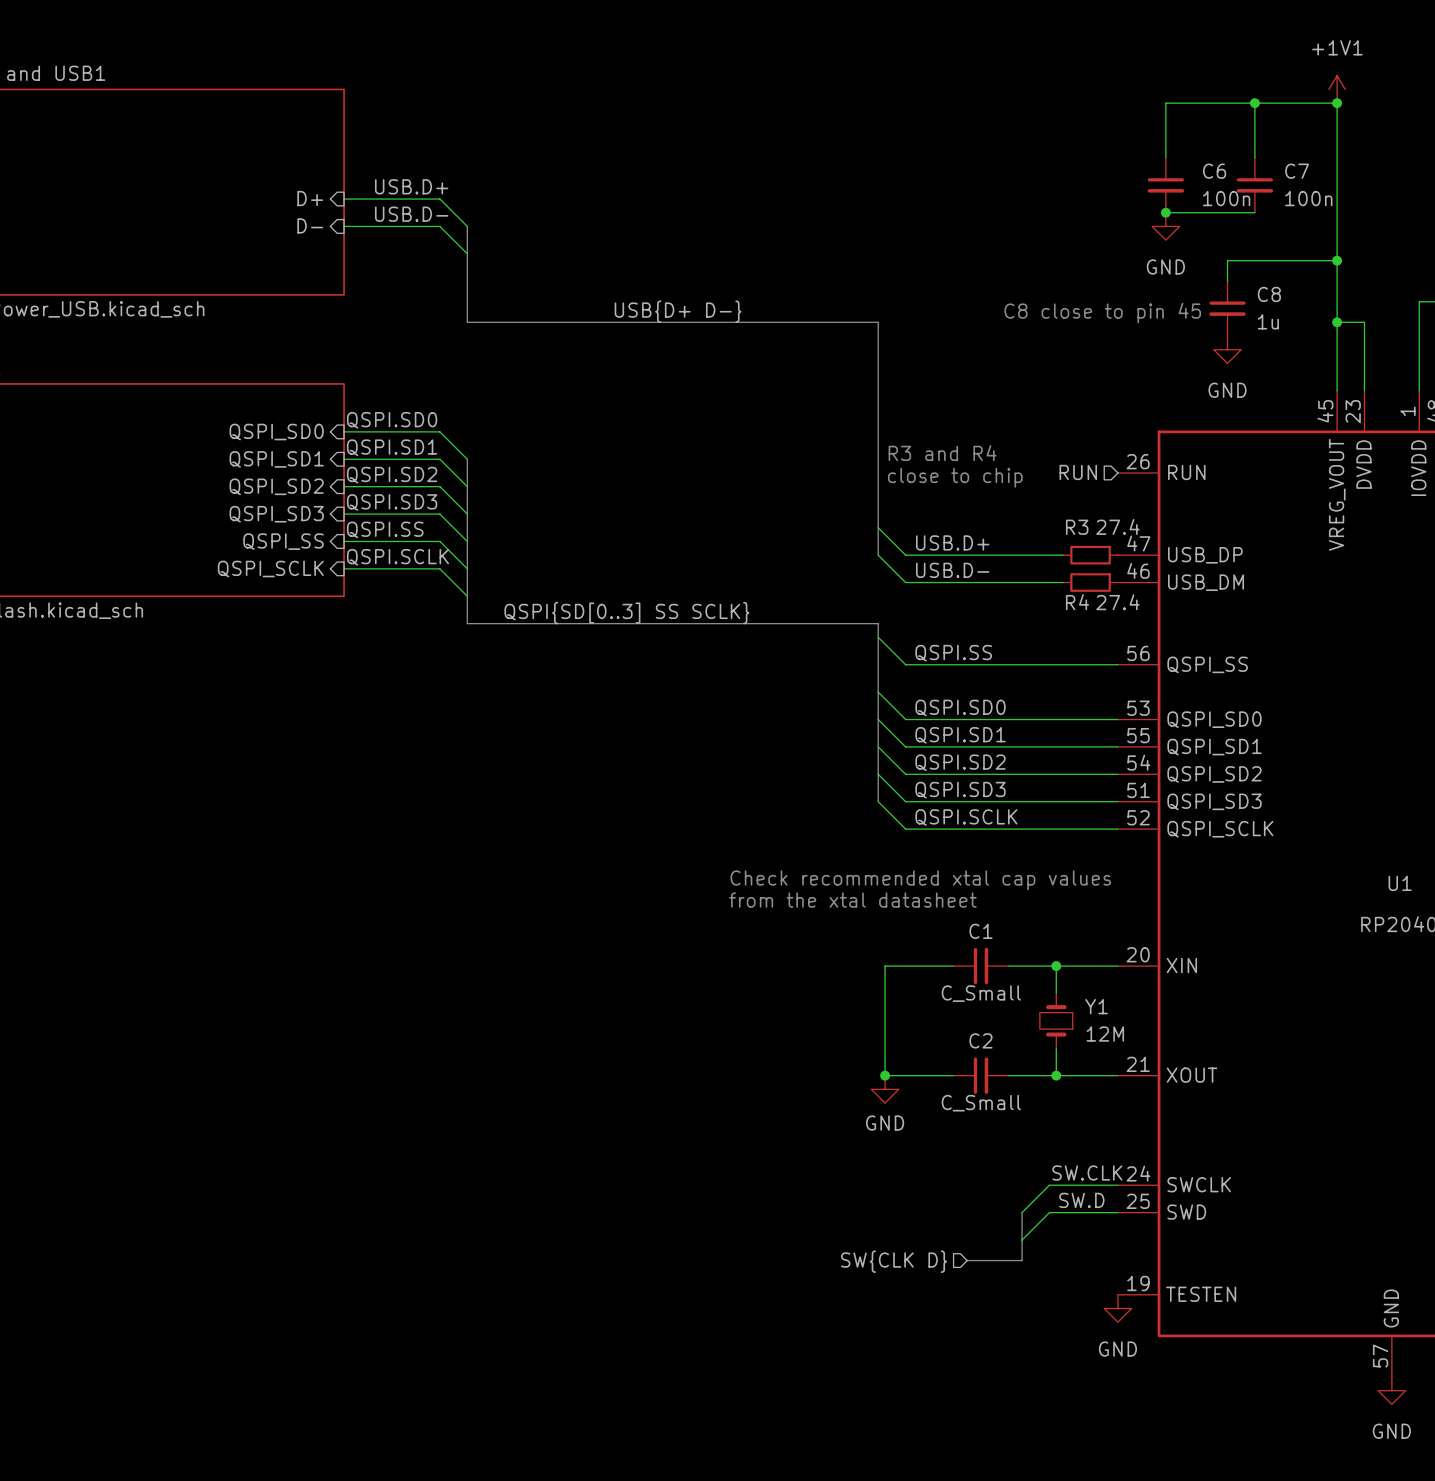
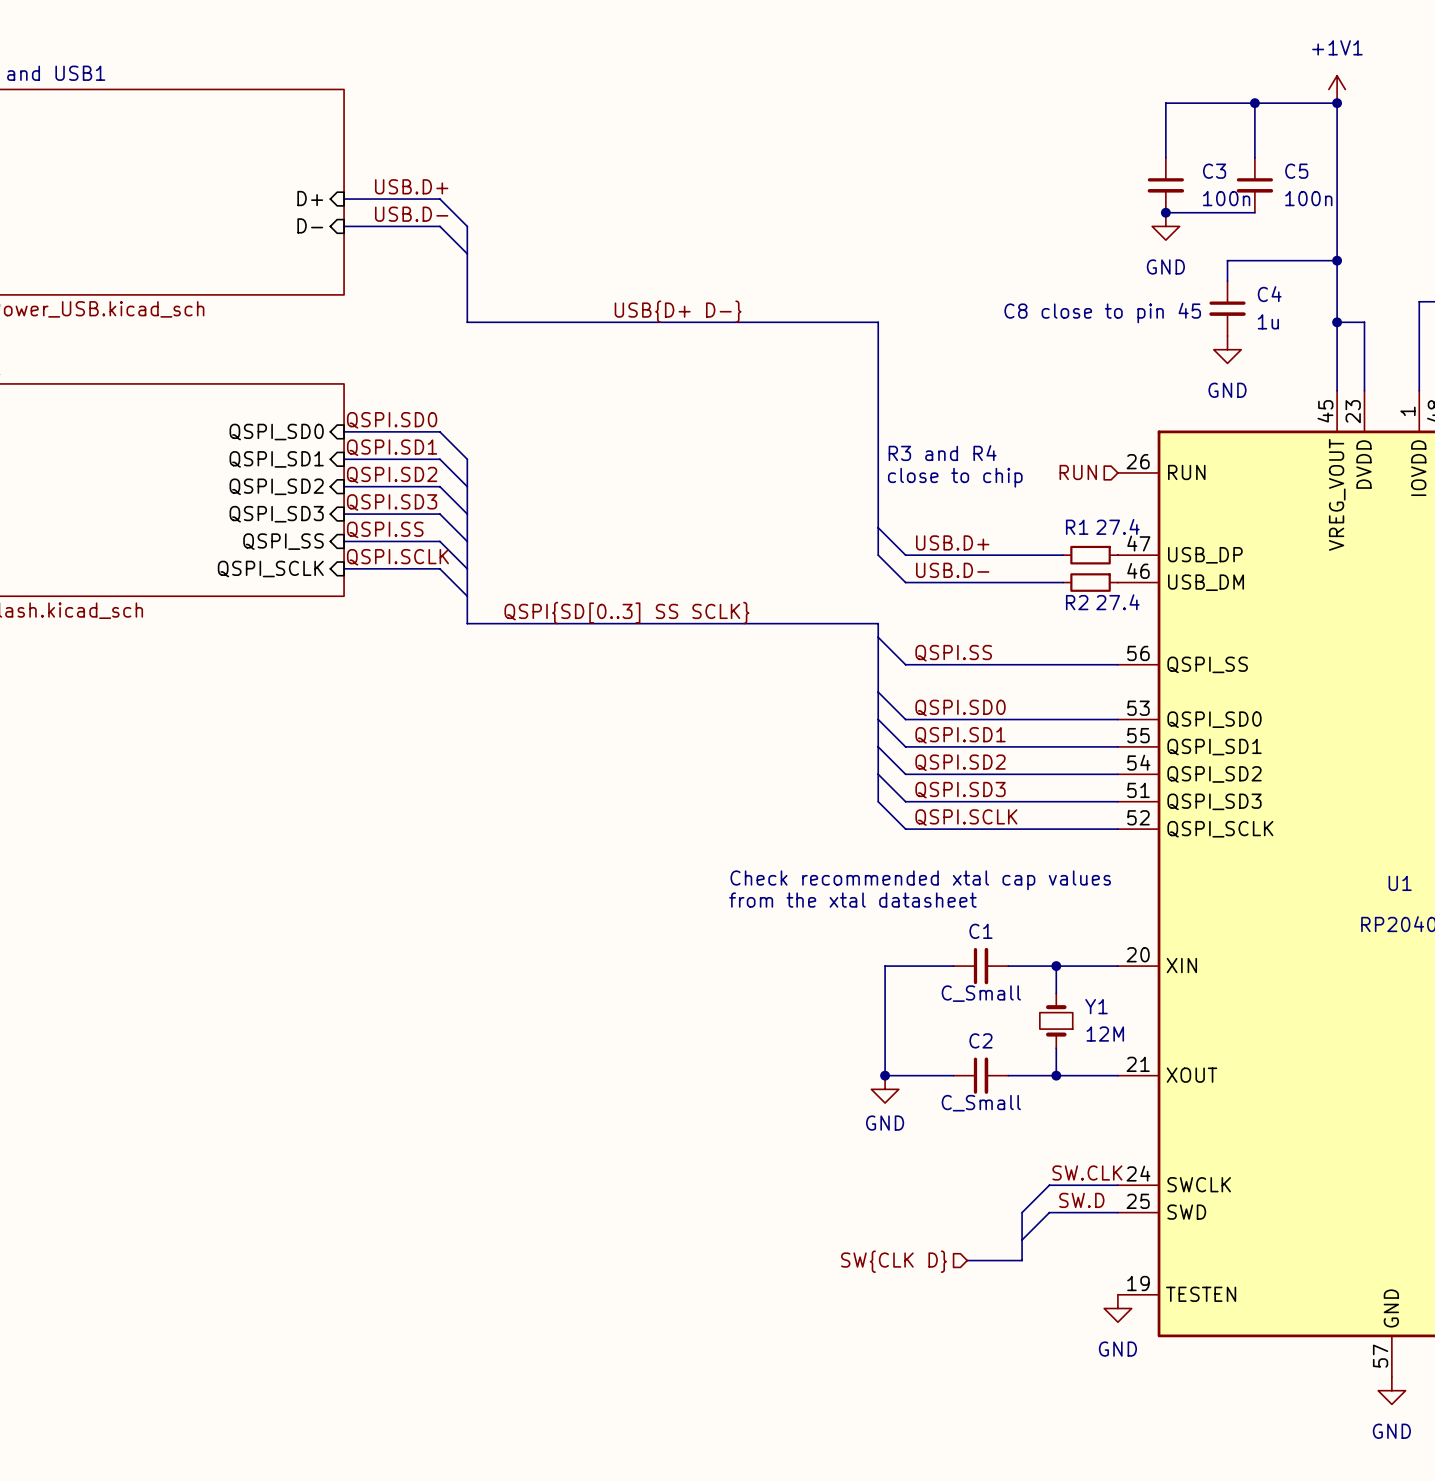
C6 name: C6 (1214, 171) -> C3 (1214, 171)
C7 name: C7 (1297, 171) -> C5 (1296, 171)
C8 name: C8 (1269, 294) -> C4 (1269, 294)
R3 name: R3 (1077, 527) -> R1 (1077, 527)
R4 name: R4 (1077, 602) -> R2 (1077, 602)

